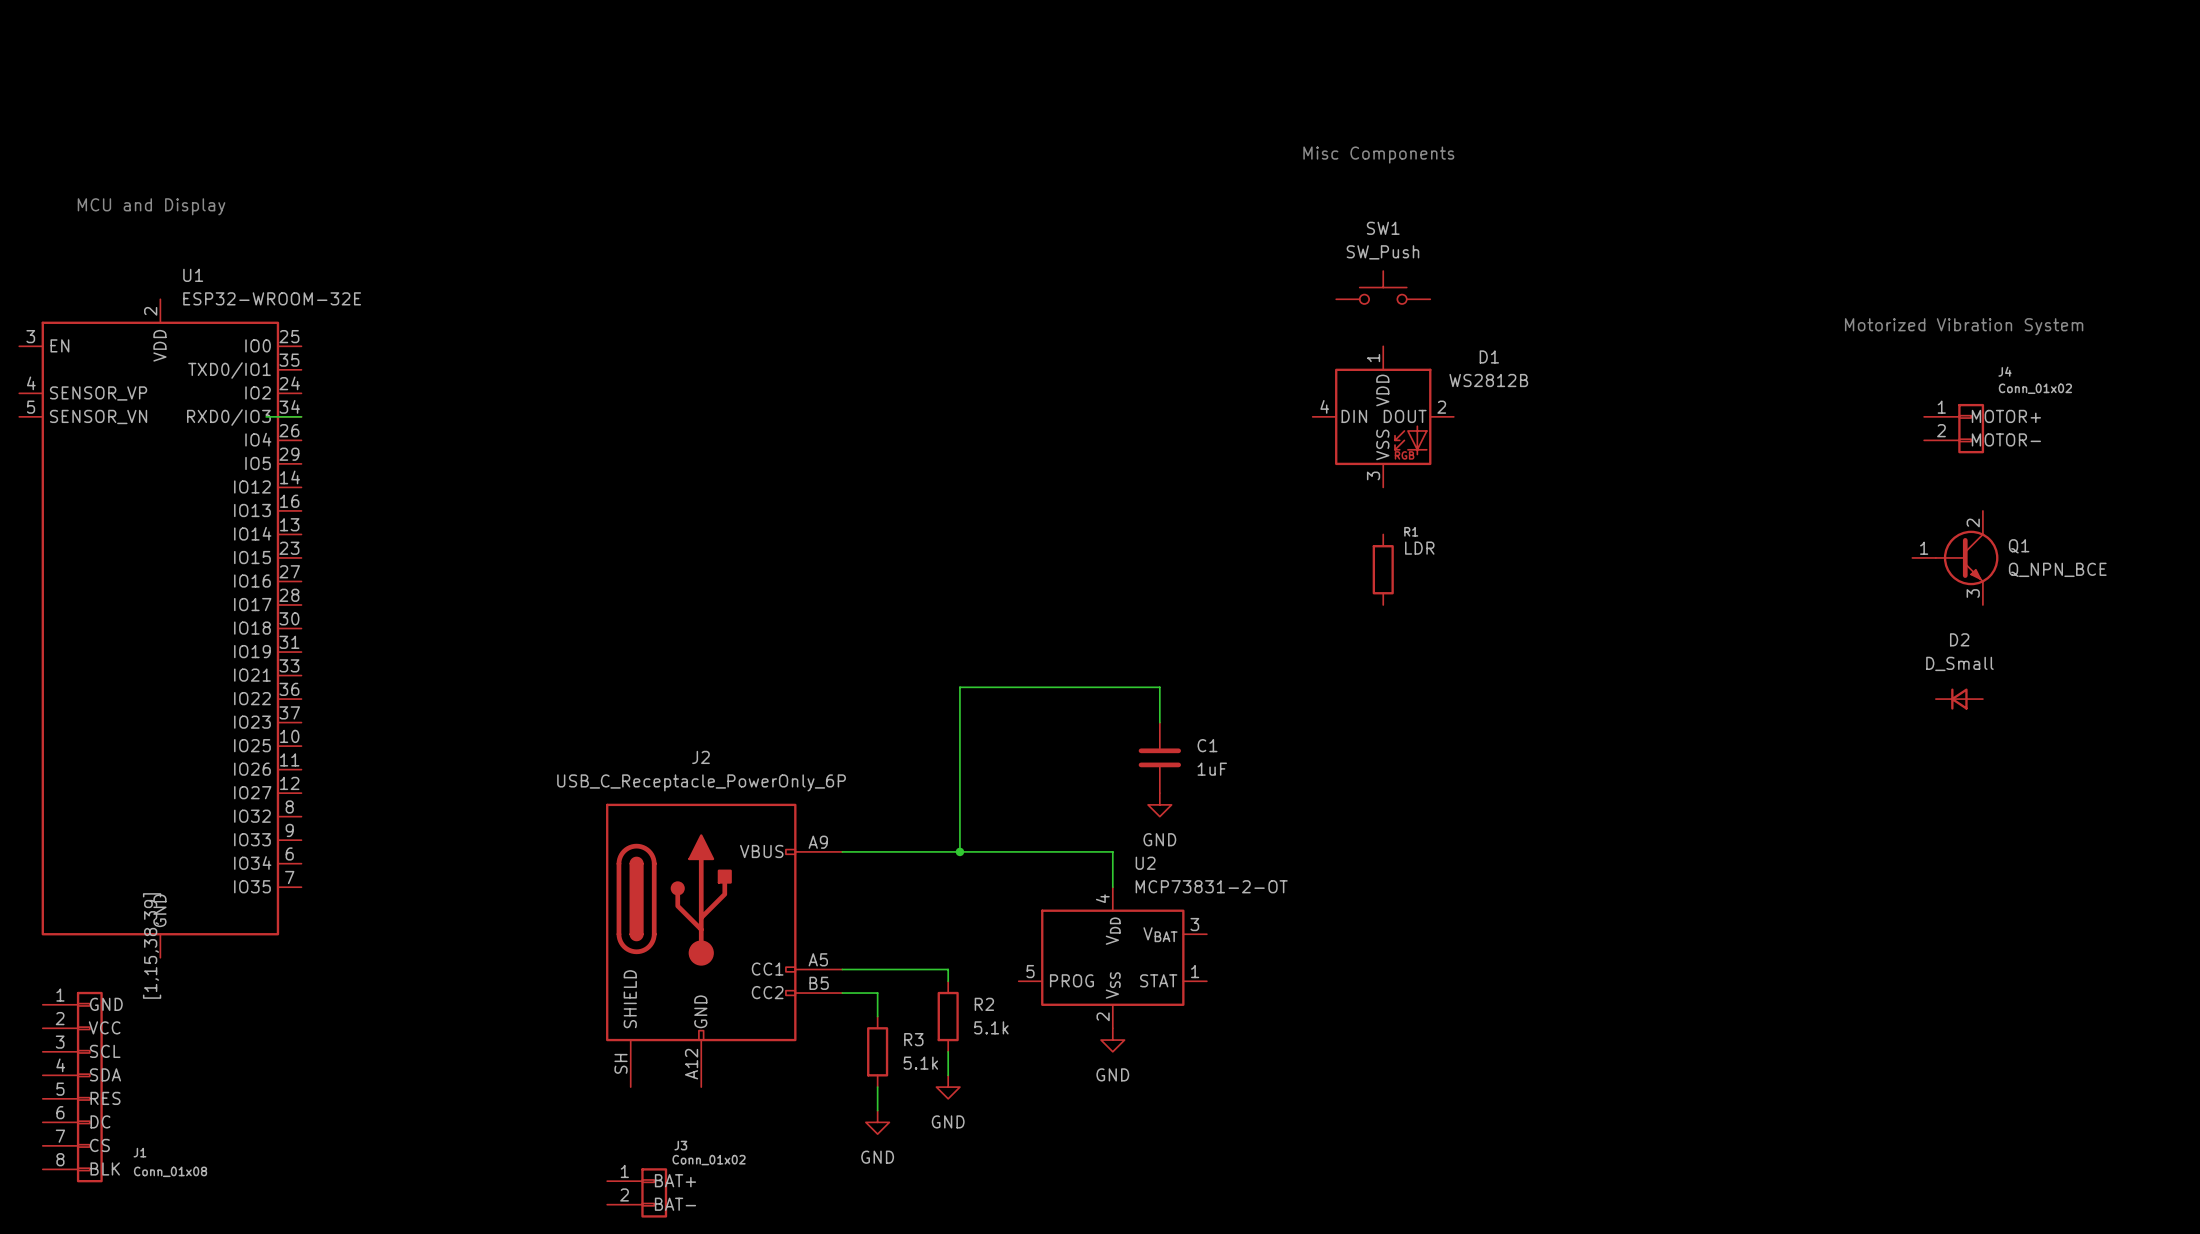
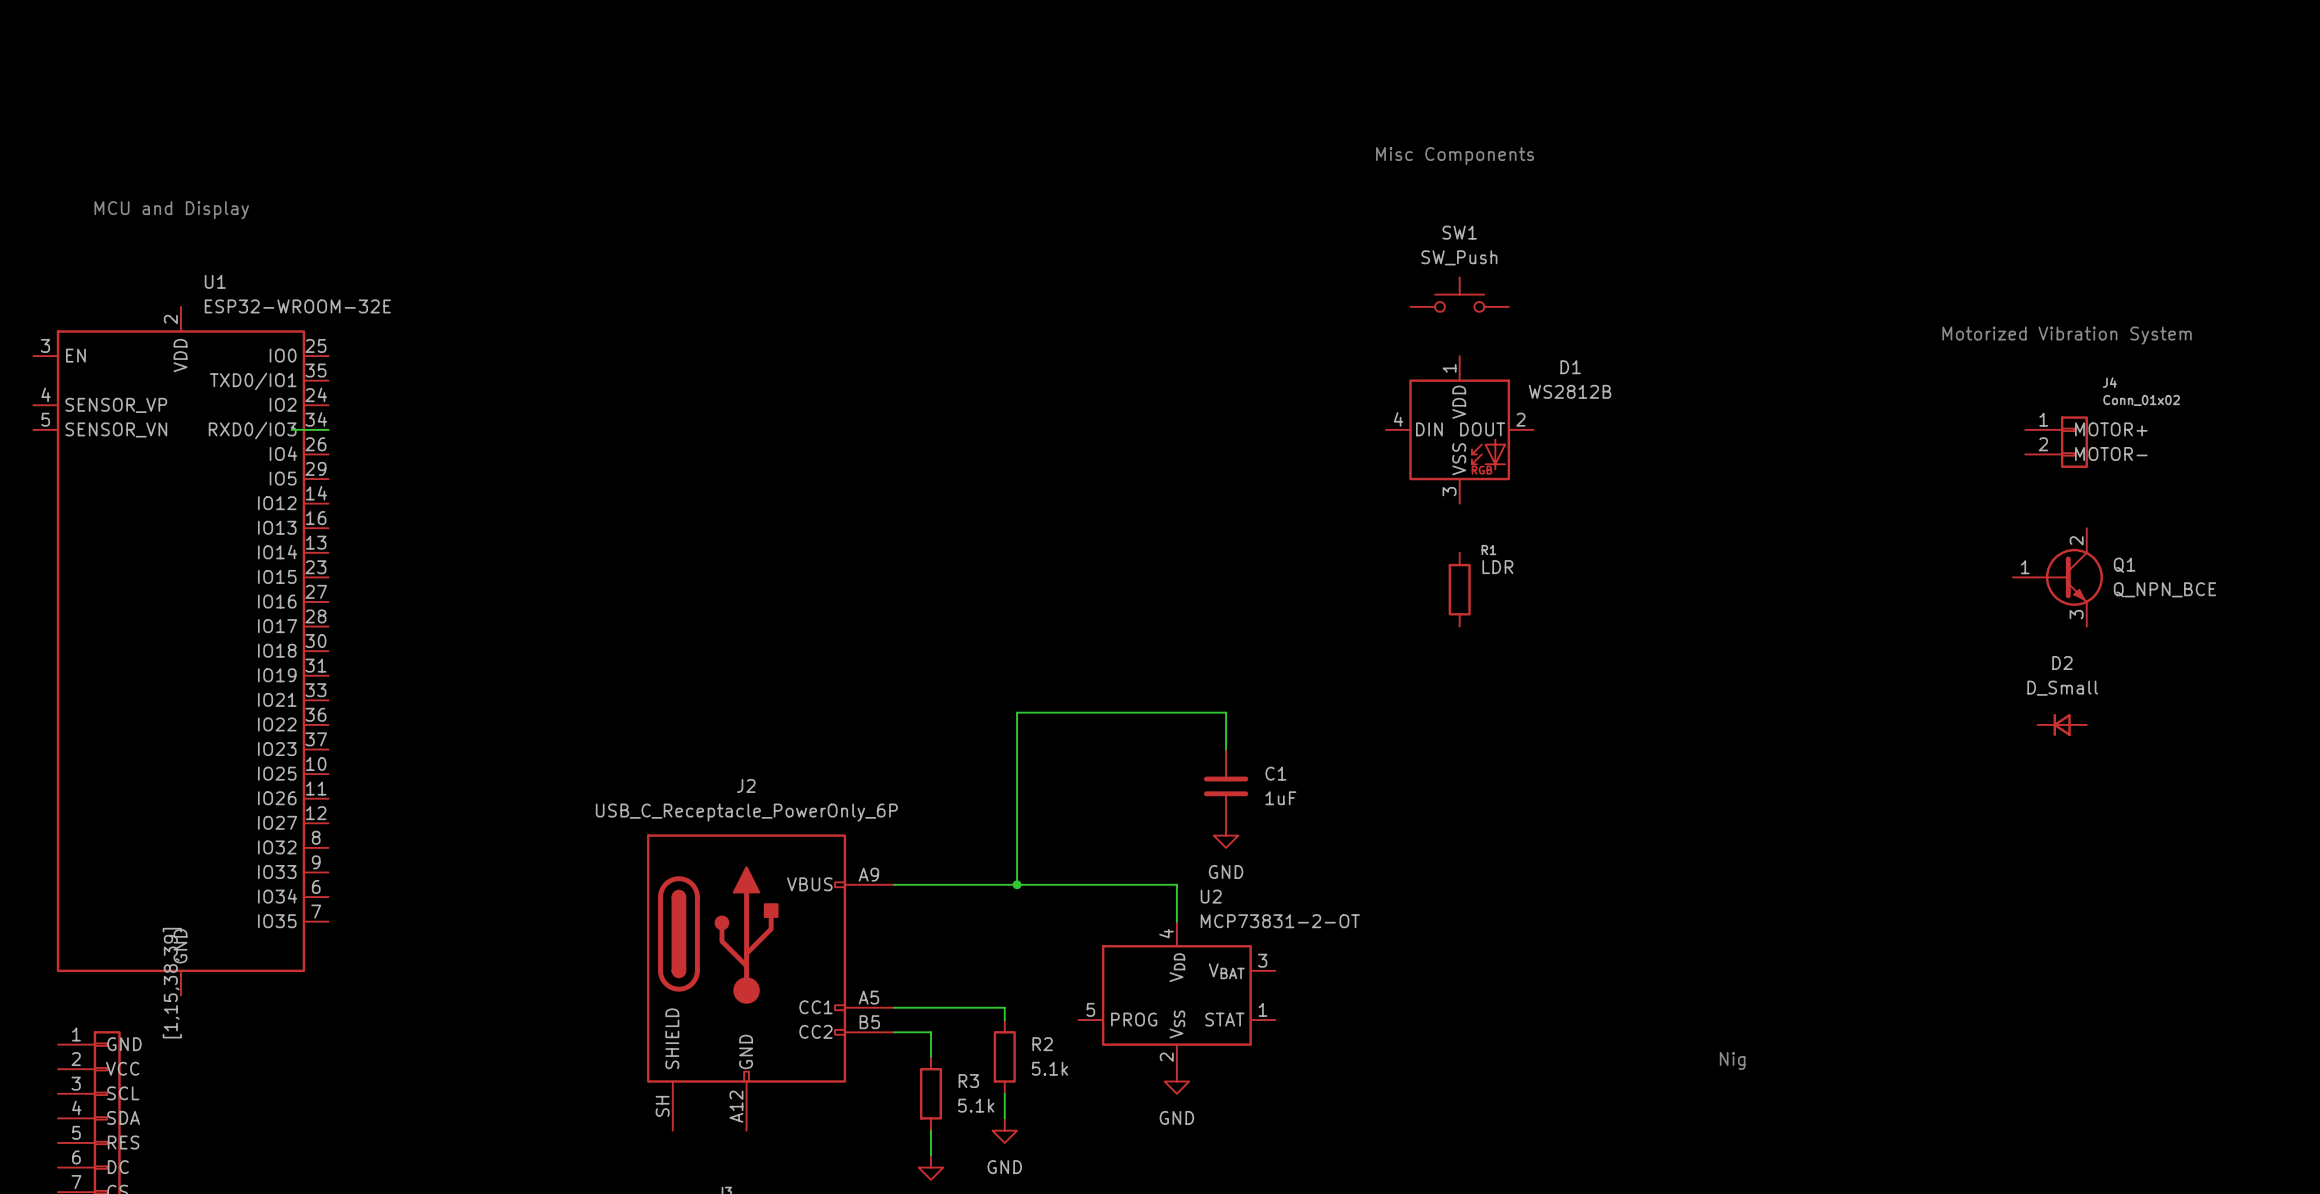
text: none -> Nig (1732, 1061)

